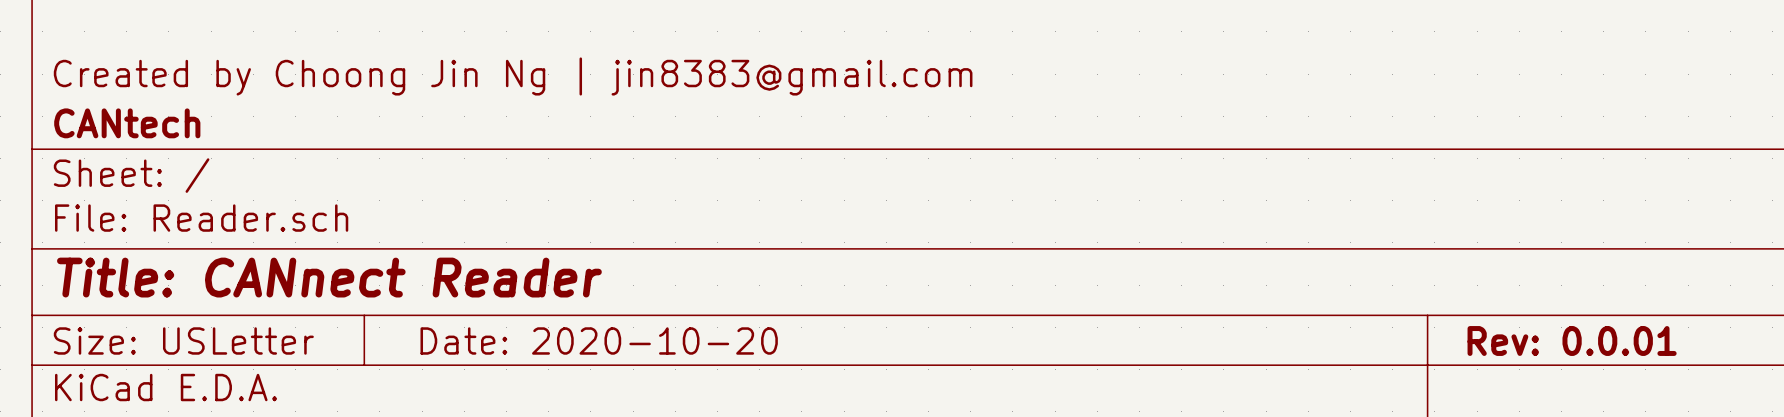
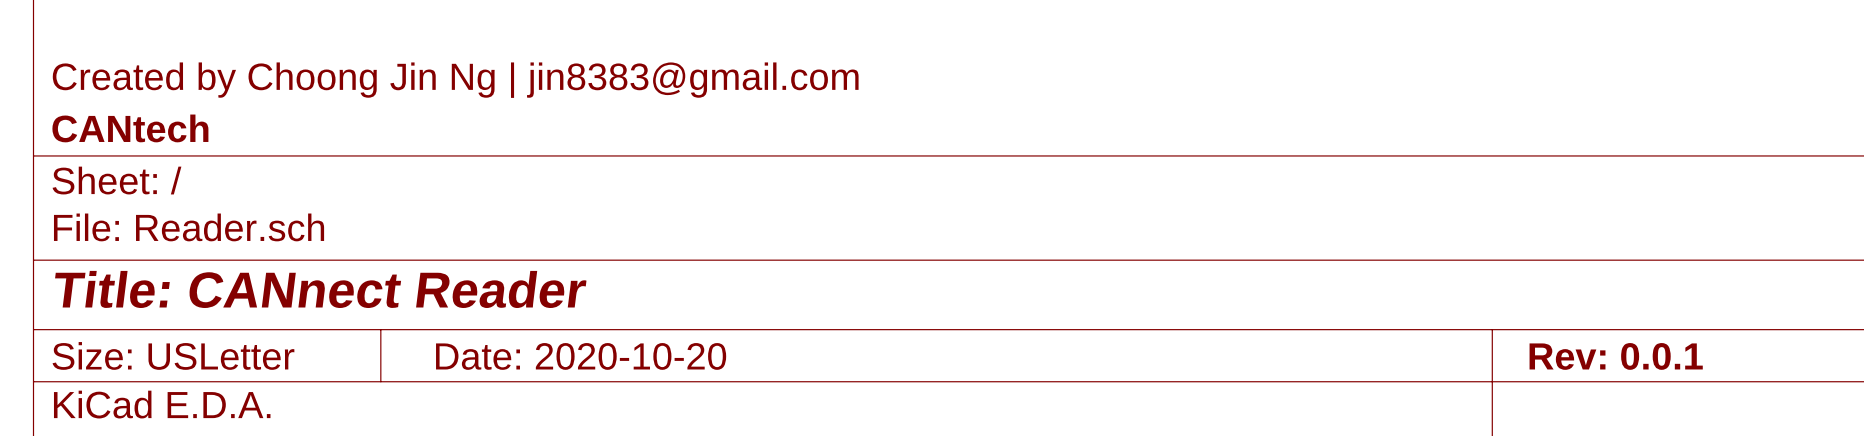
title block: Rev: 0.0.01 (1572, 341) -> Rev: 0.0.1 (1616, 356)

